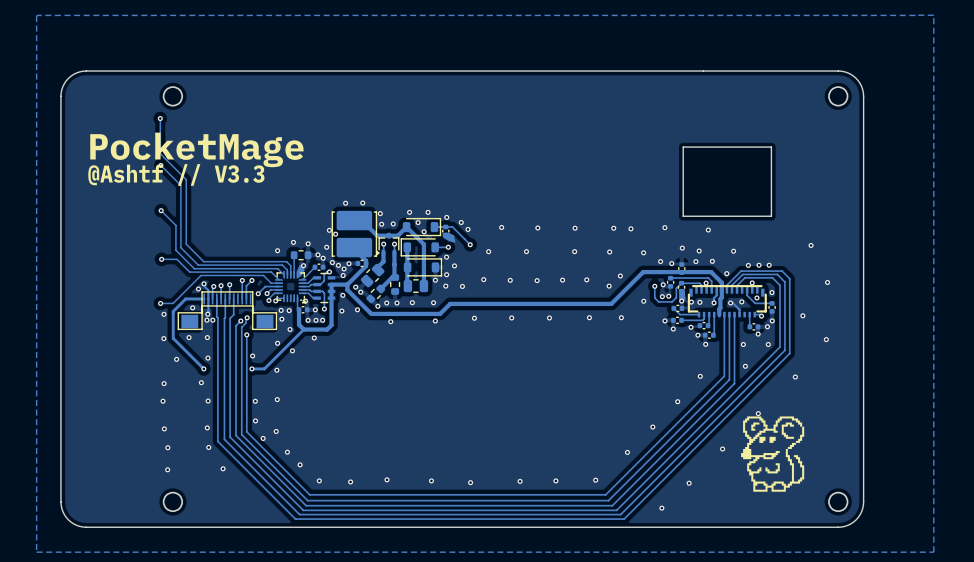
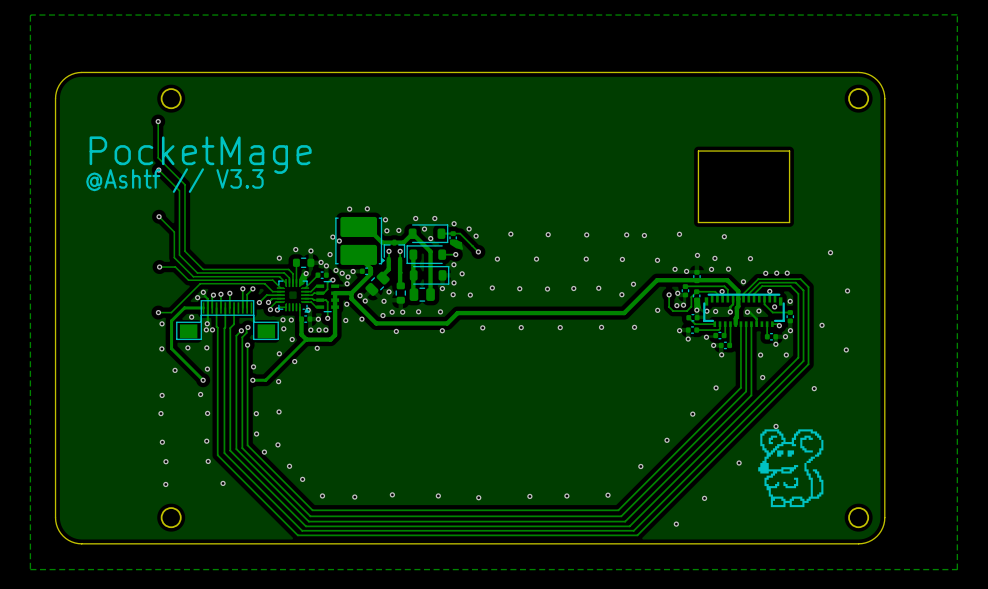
track: (395, 277) (392, 277) (380, 289) -> none
via: none -> (389, 291)
via: none -> (384, 301)
part: (375, 293) -> none

